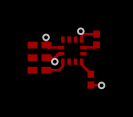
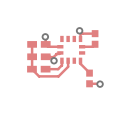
top track: none -> (32, 44) (32, 69)
top track: none -> (68, 60) (68, 66) (58, 76) (39, 76) (32, 69)

